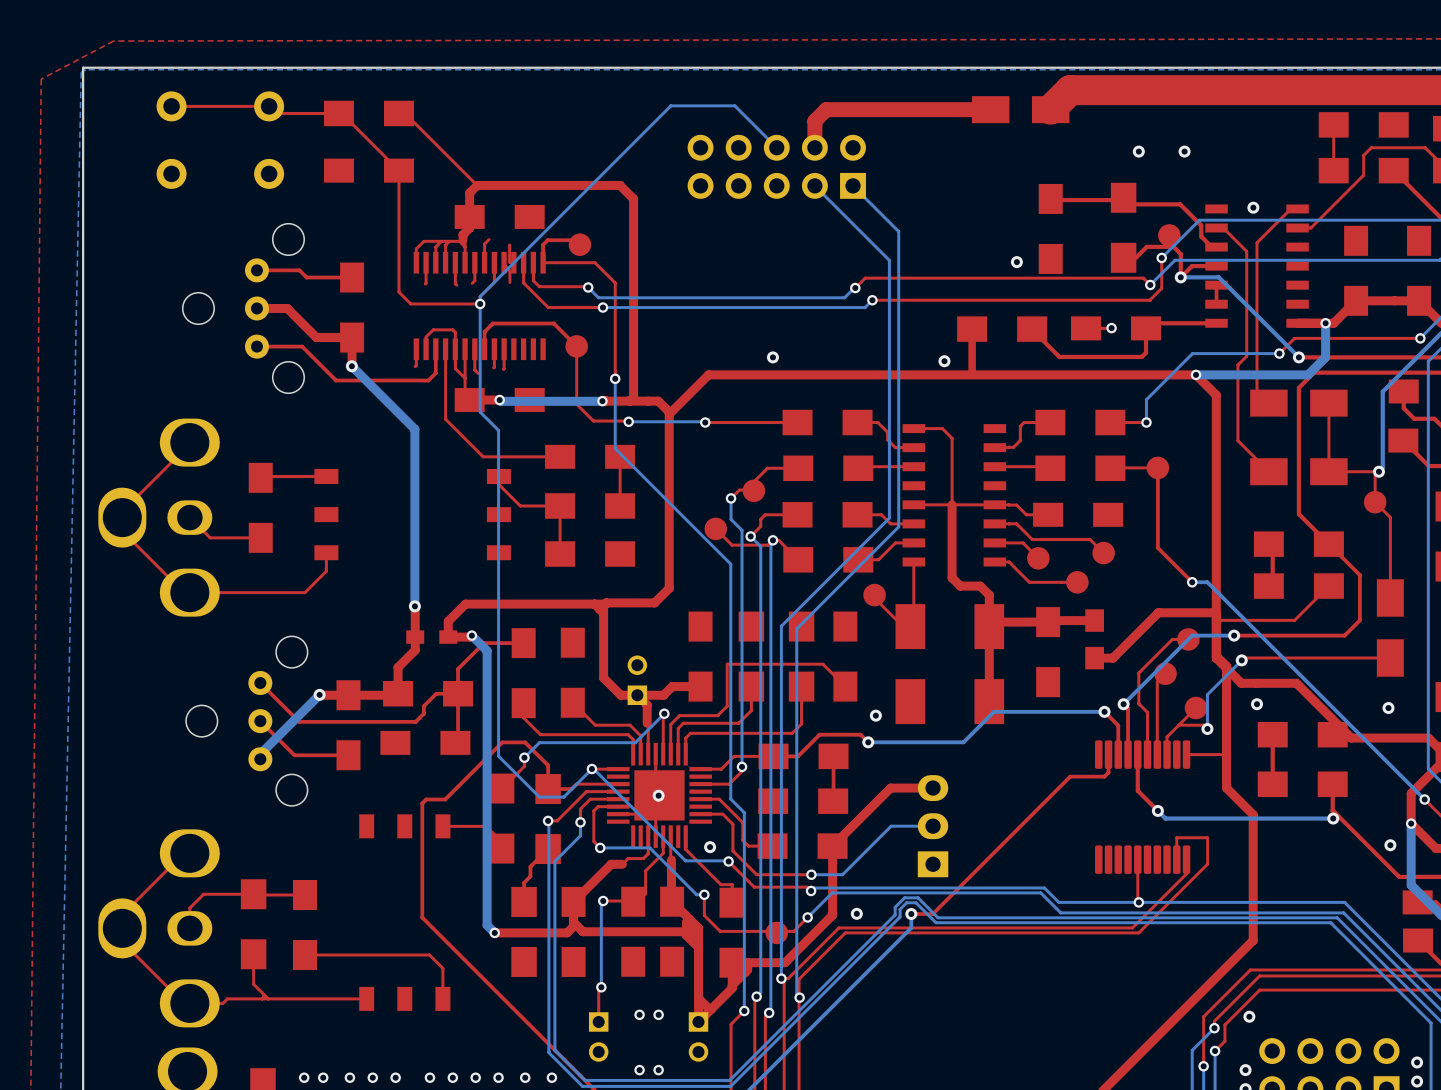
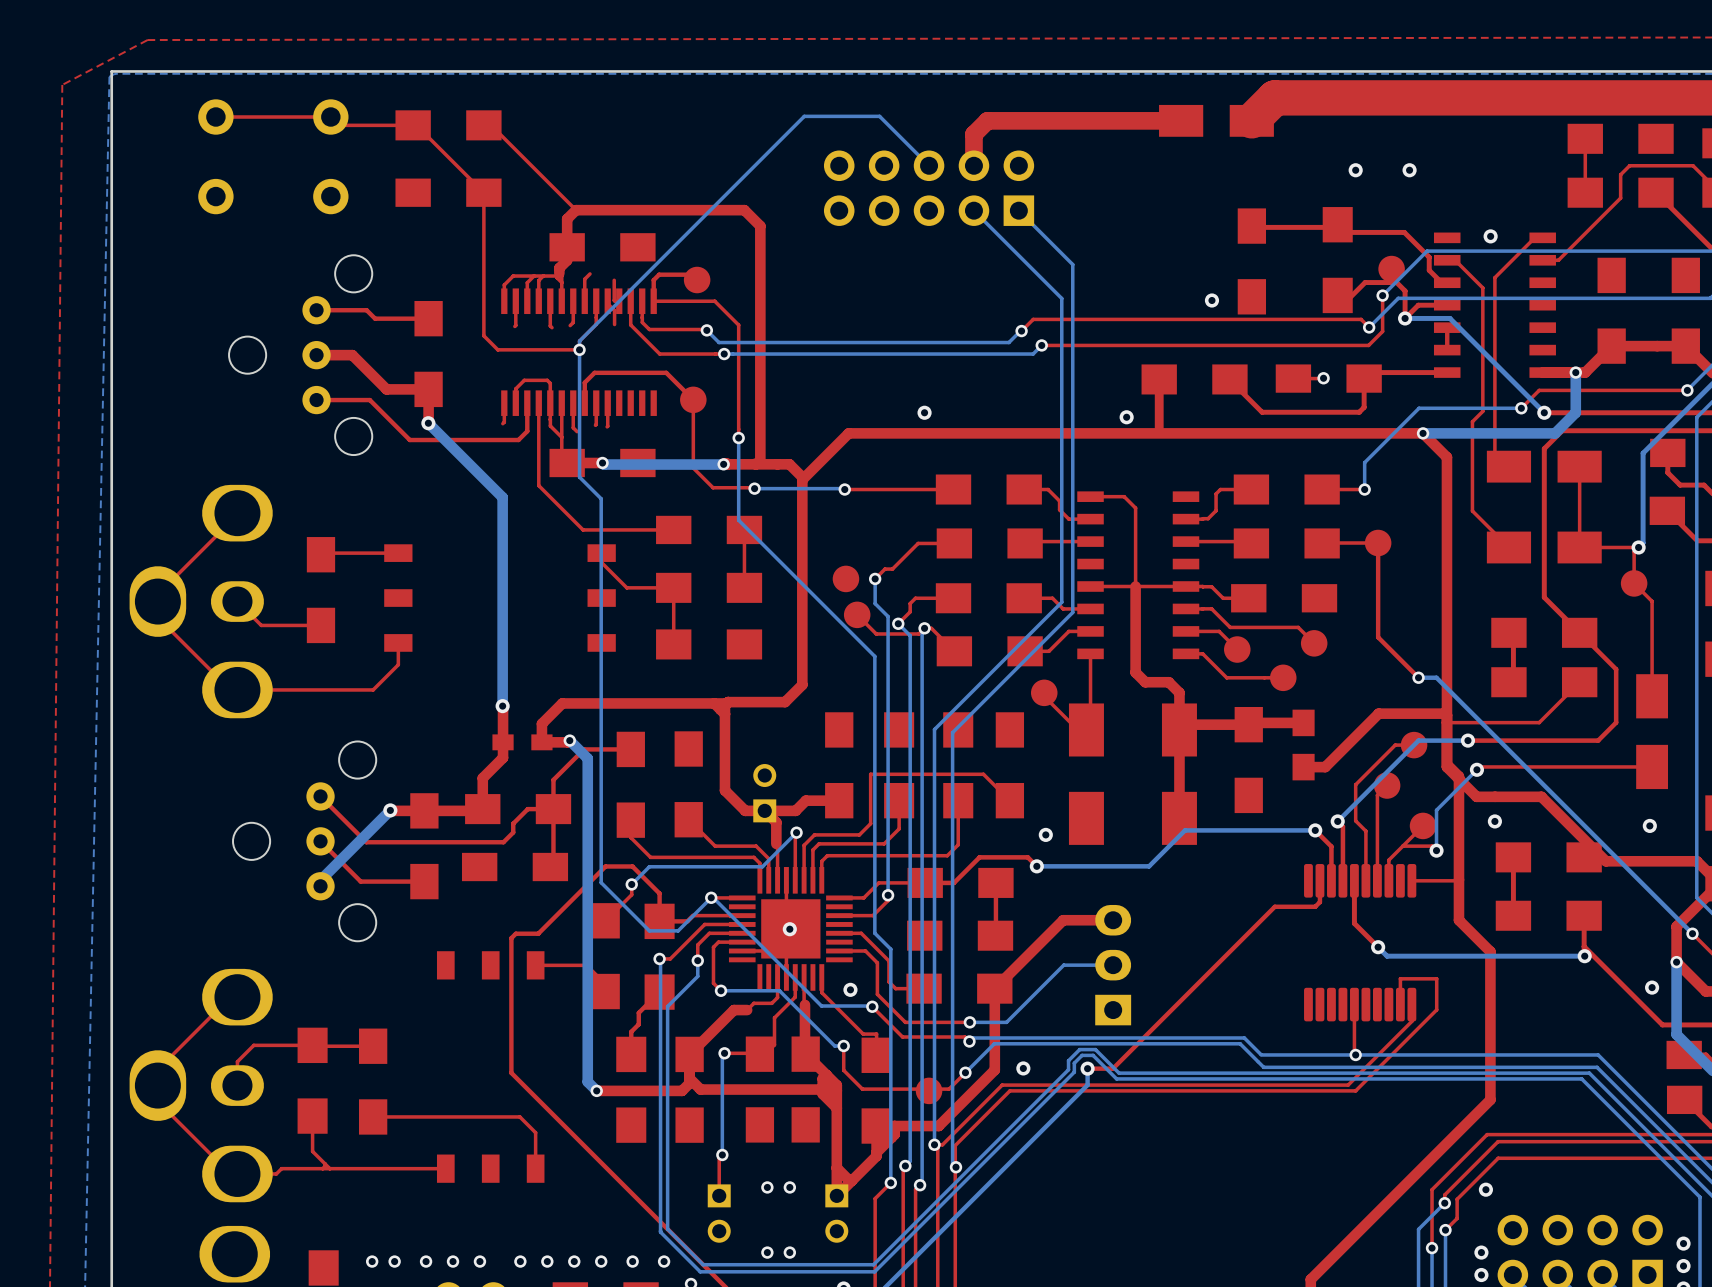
part position: (753, 490) -> (845, 578)

